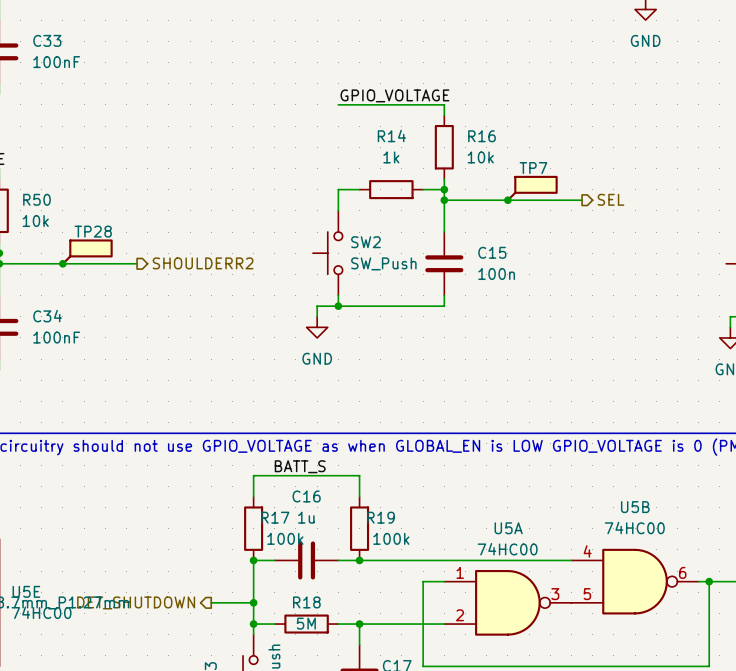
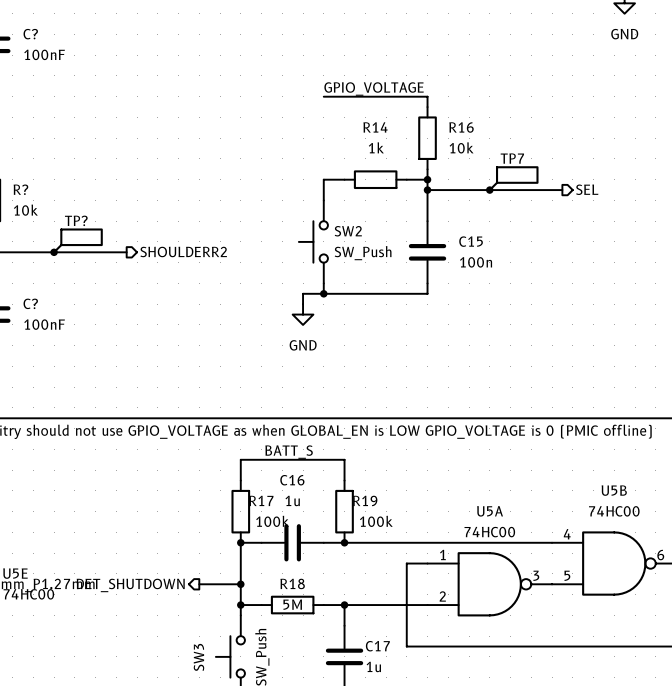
C33 name: C33 (47, 40) -> C? (30, 34)
R50 name: R50 (36, 199) -> R? (20, 189)
TP28 name: TP28 (93, 231) -> TP? (76, 220)
C34 name: C34 (47, 316) -> C? (30, 303)

